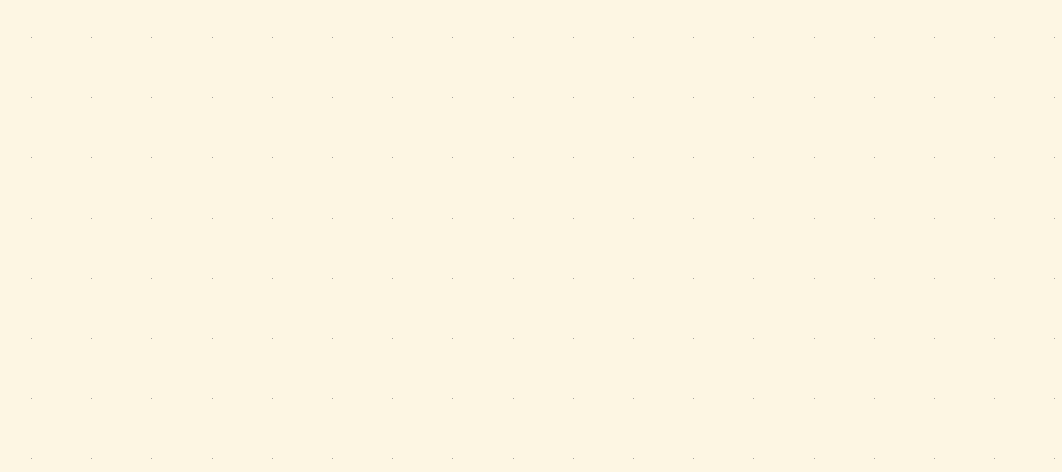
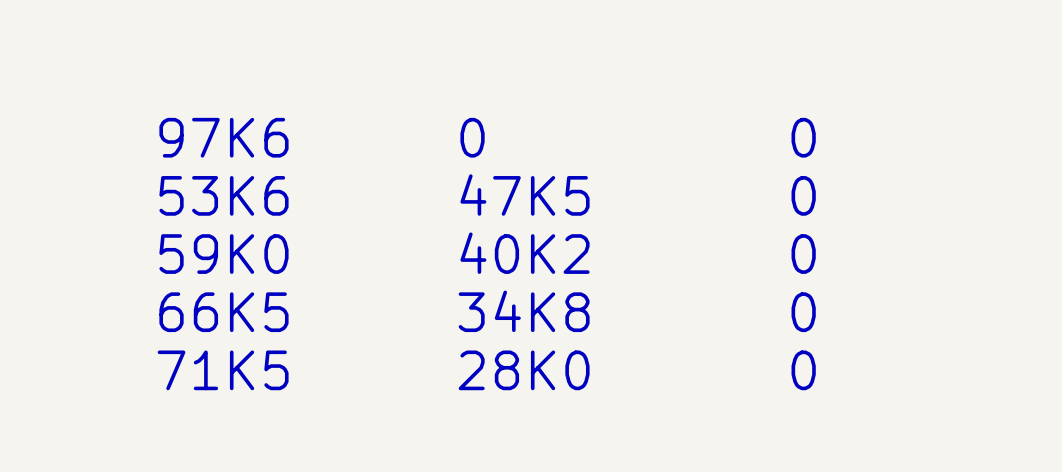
text: none -> 97K6 (223, 137)
text: none -> 0 (472, 137)
text: none -> 0 (803, 137)
text: none -> 53K6 (223, 195)
text: none -> 0 (803, 195)
text: none -> 47K5 (525, 195)
text: none -> 59K0 (223, 254)
text: none -> 40K2 (525, 253)
text: none -> 0 (803, 254)
text: none -> 66K5 (223, 312)
text: none -> 34K8 (524, 311)
text: none -> 0 (803, 312)
text: none -> 71K5 (223, 370)
text: none -> 28K0 (524, 370)
text: none -> 0 (803, 370)

